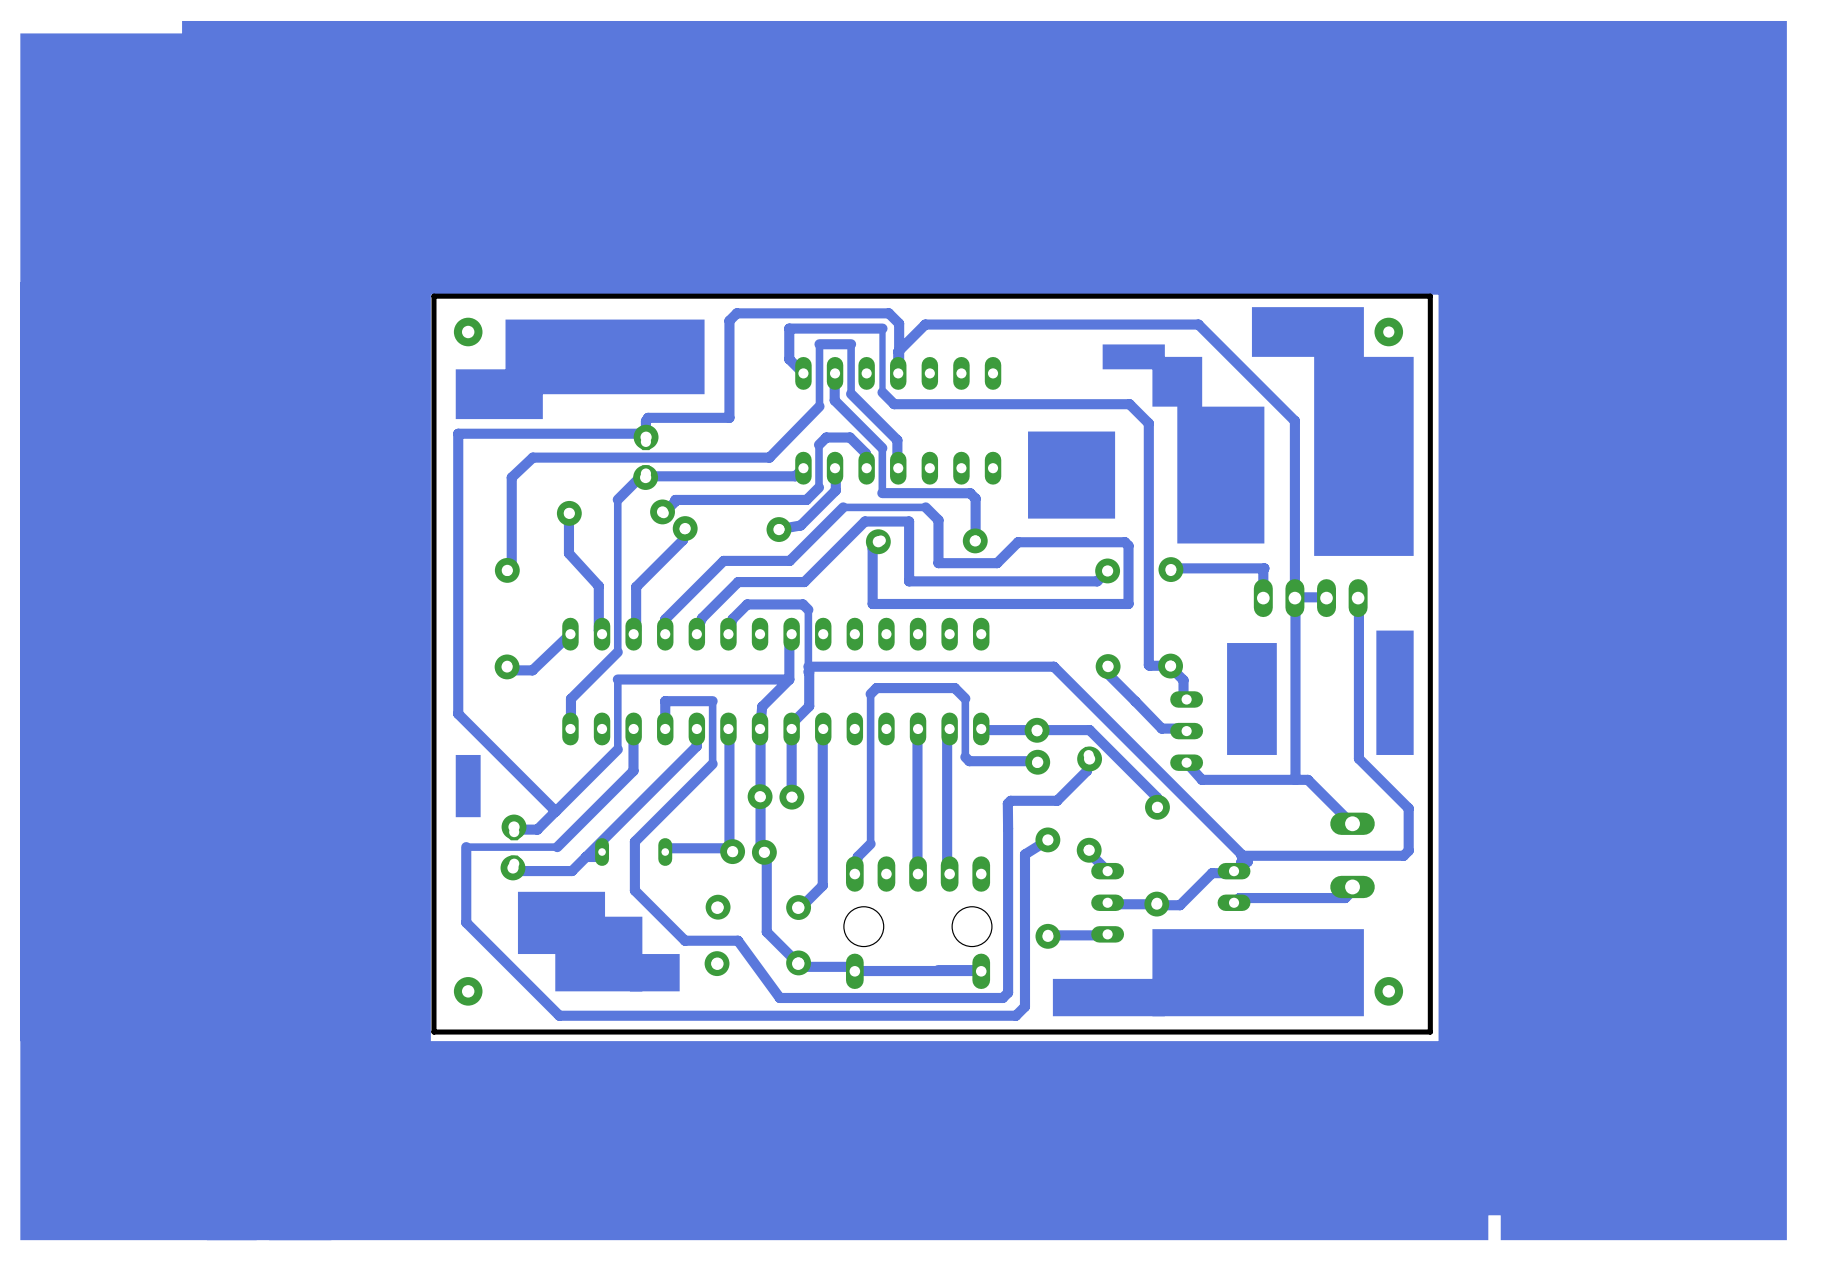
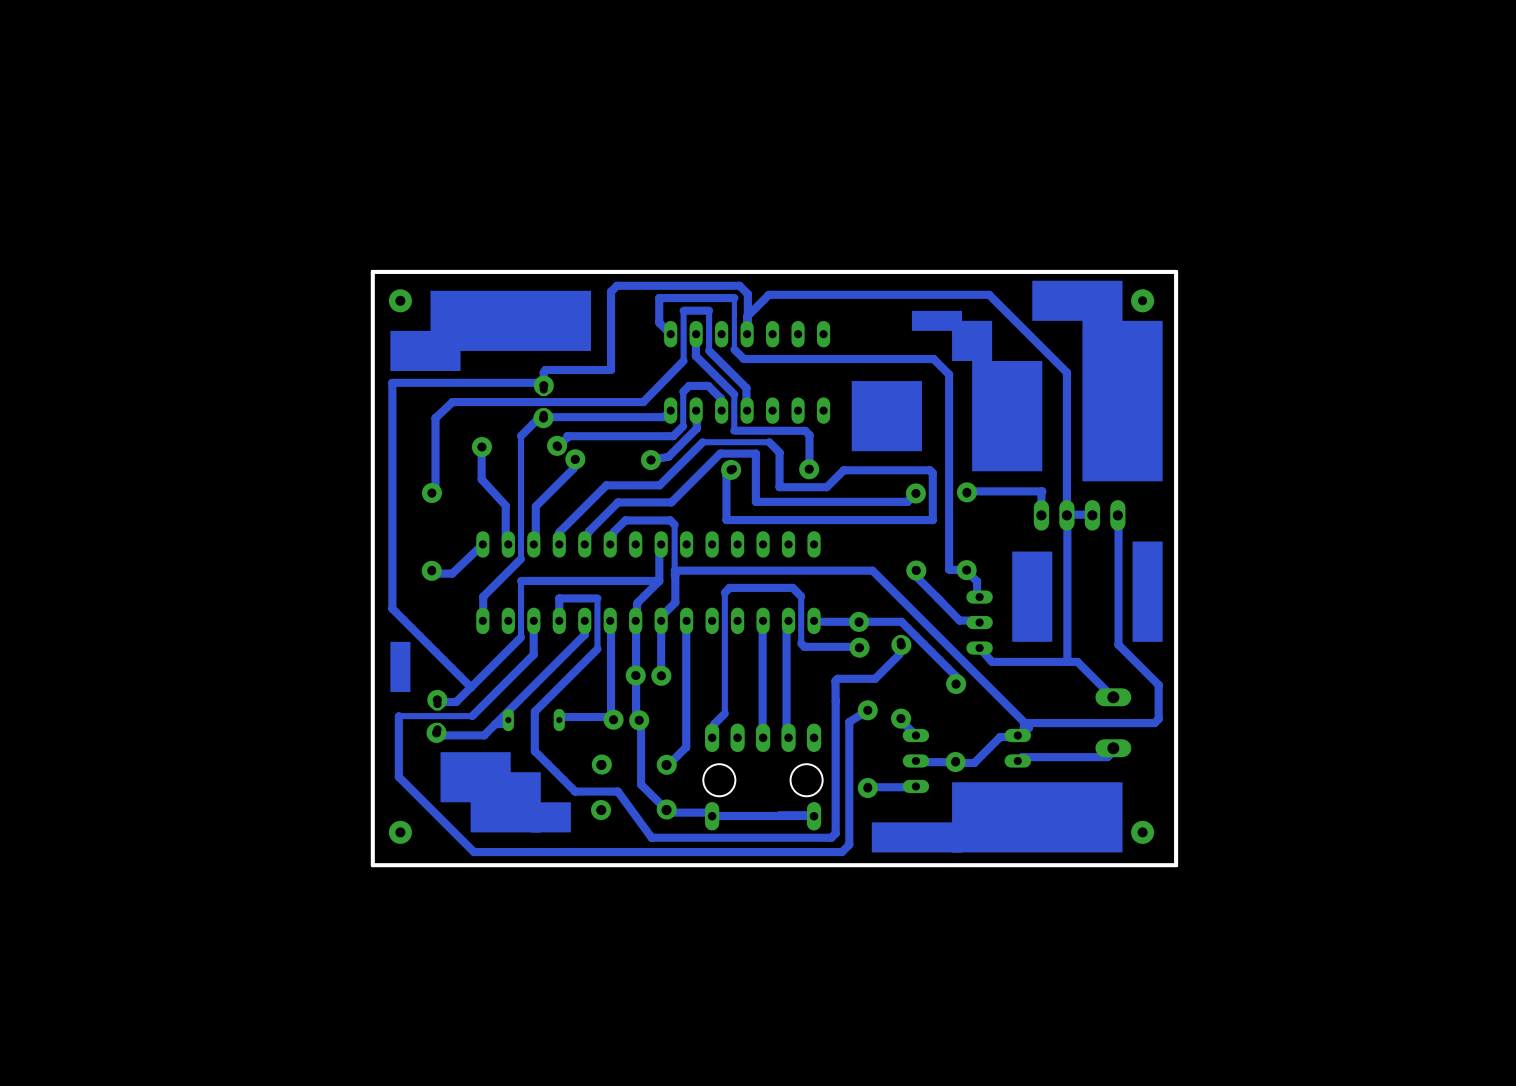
drawing: [20, 20, 1787, 1241] -> none

